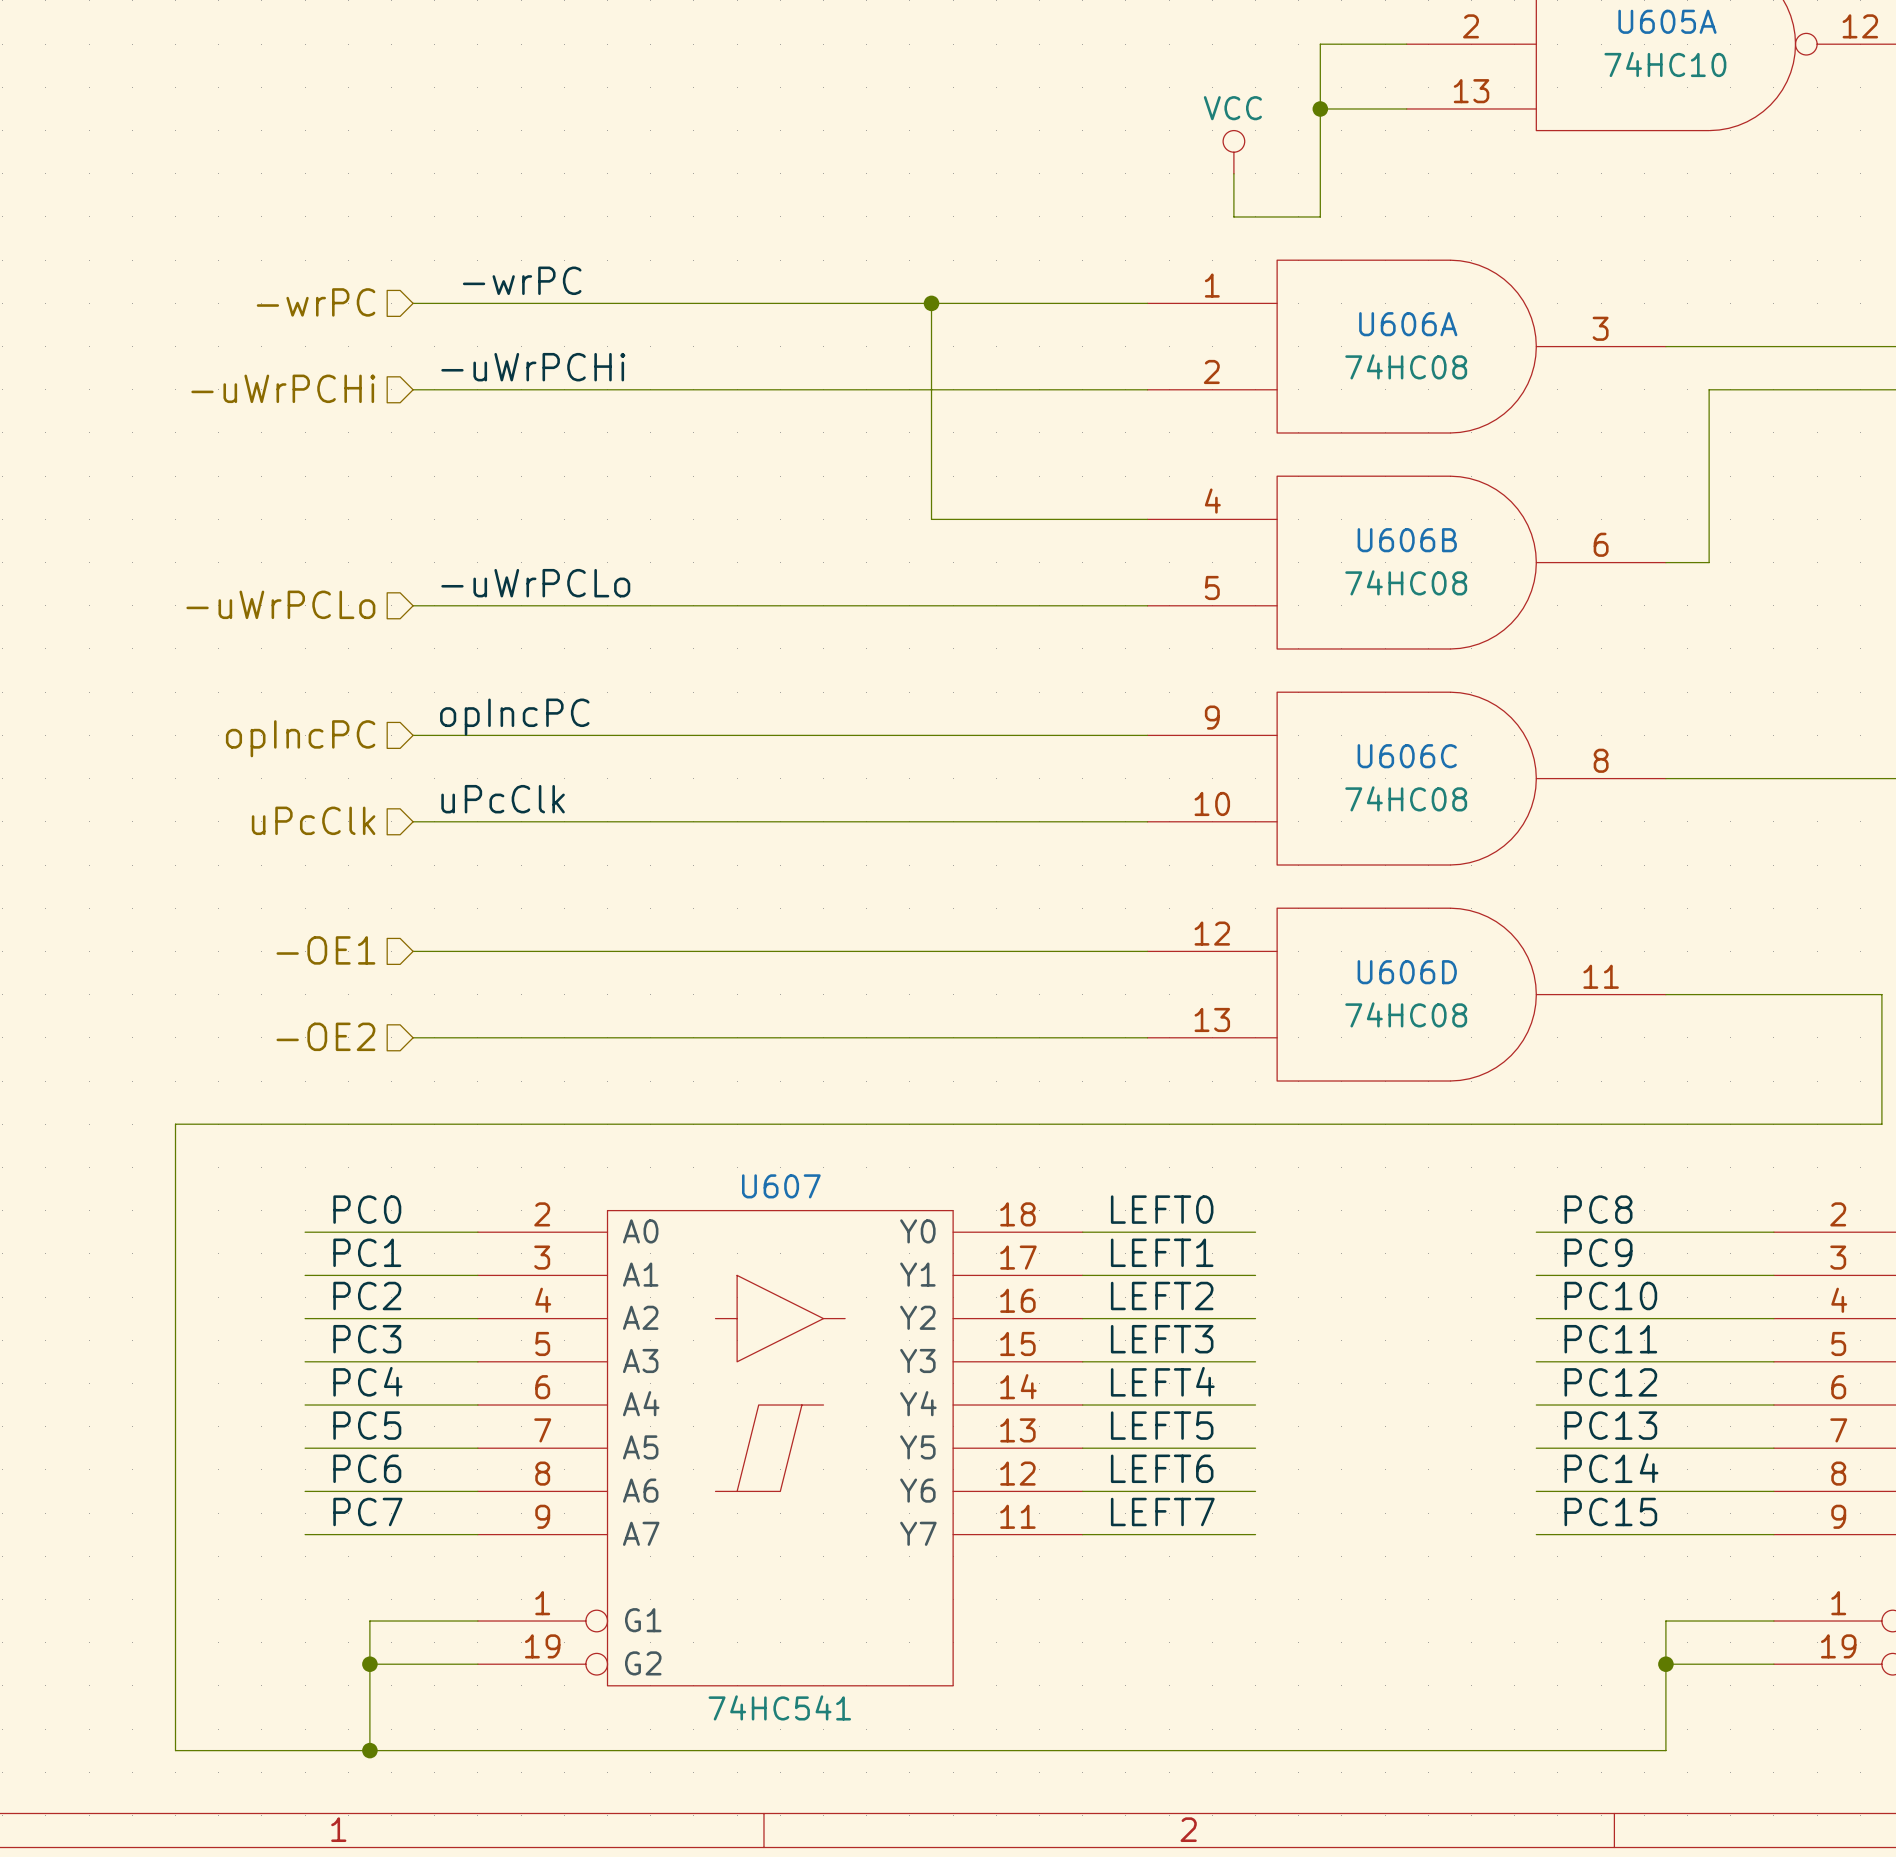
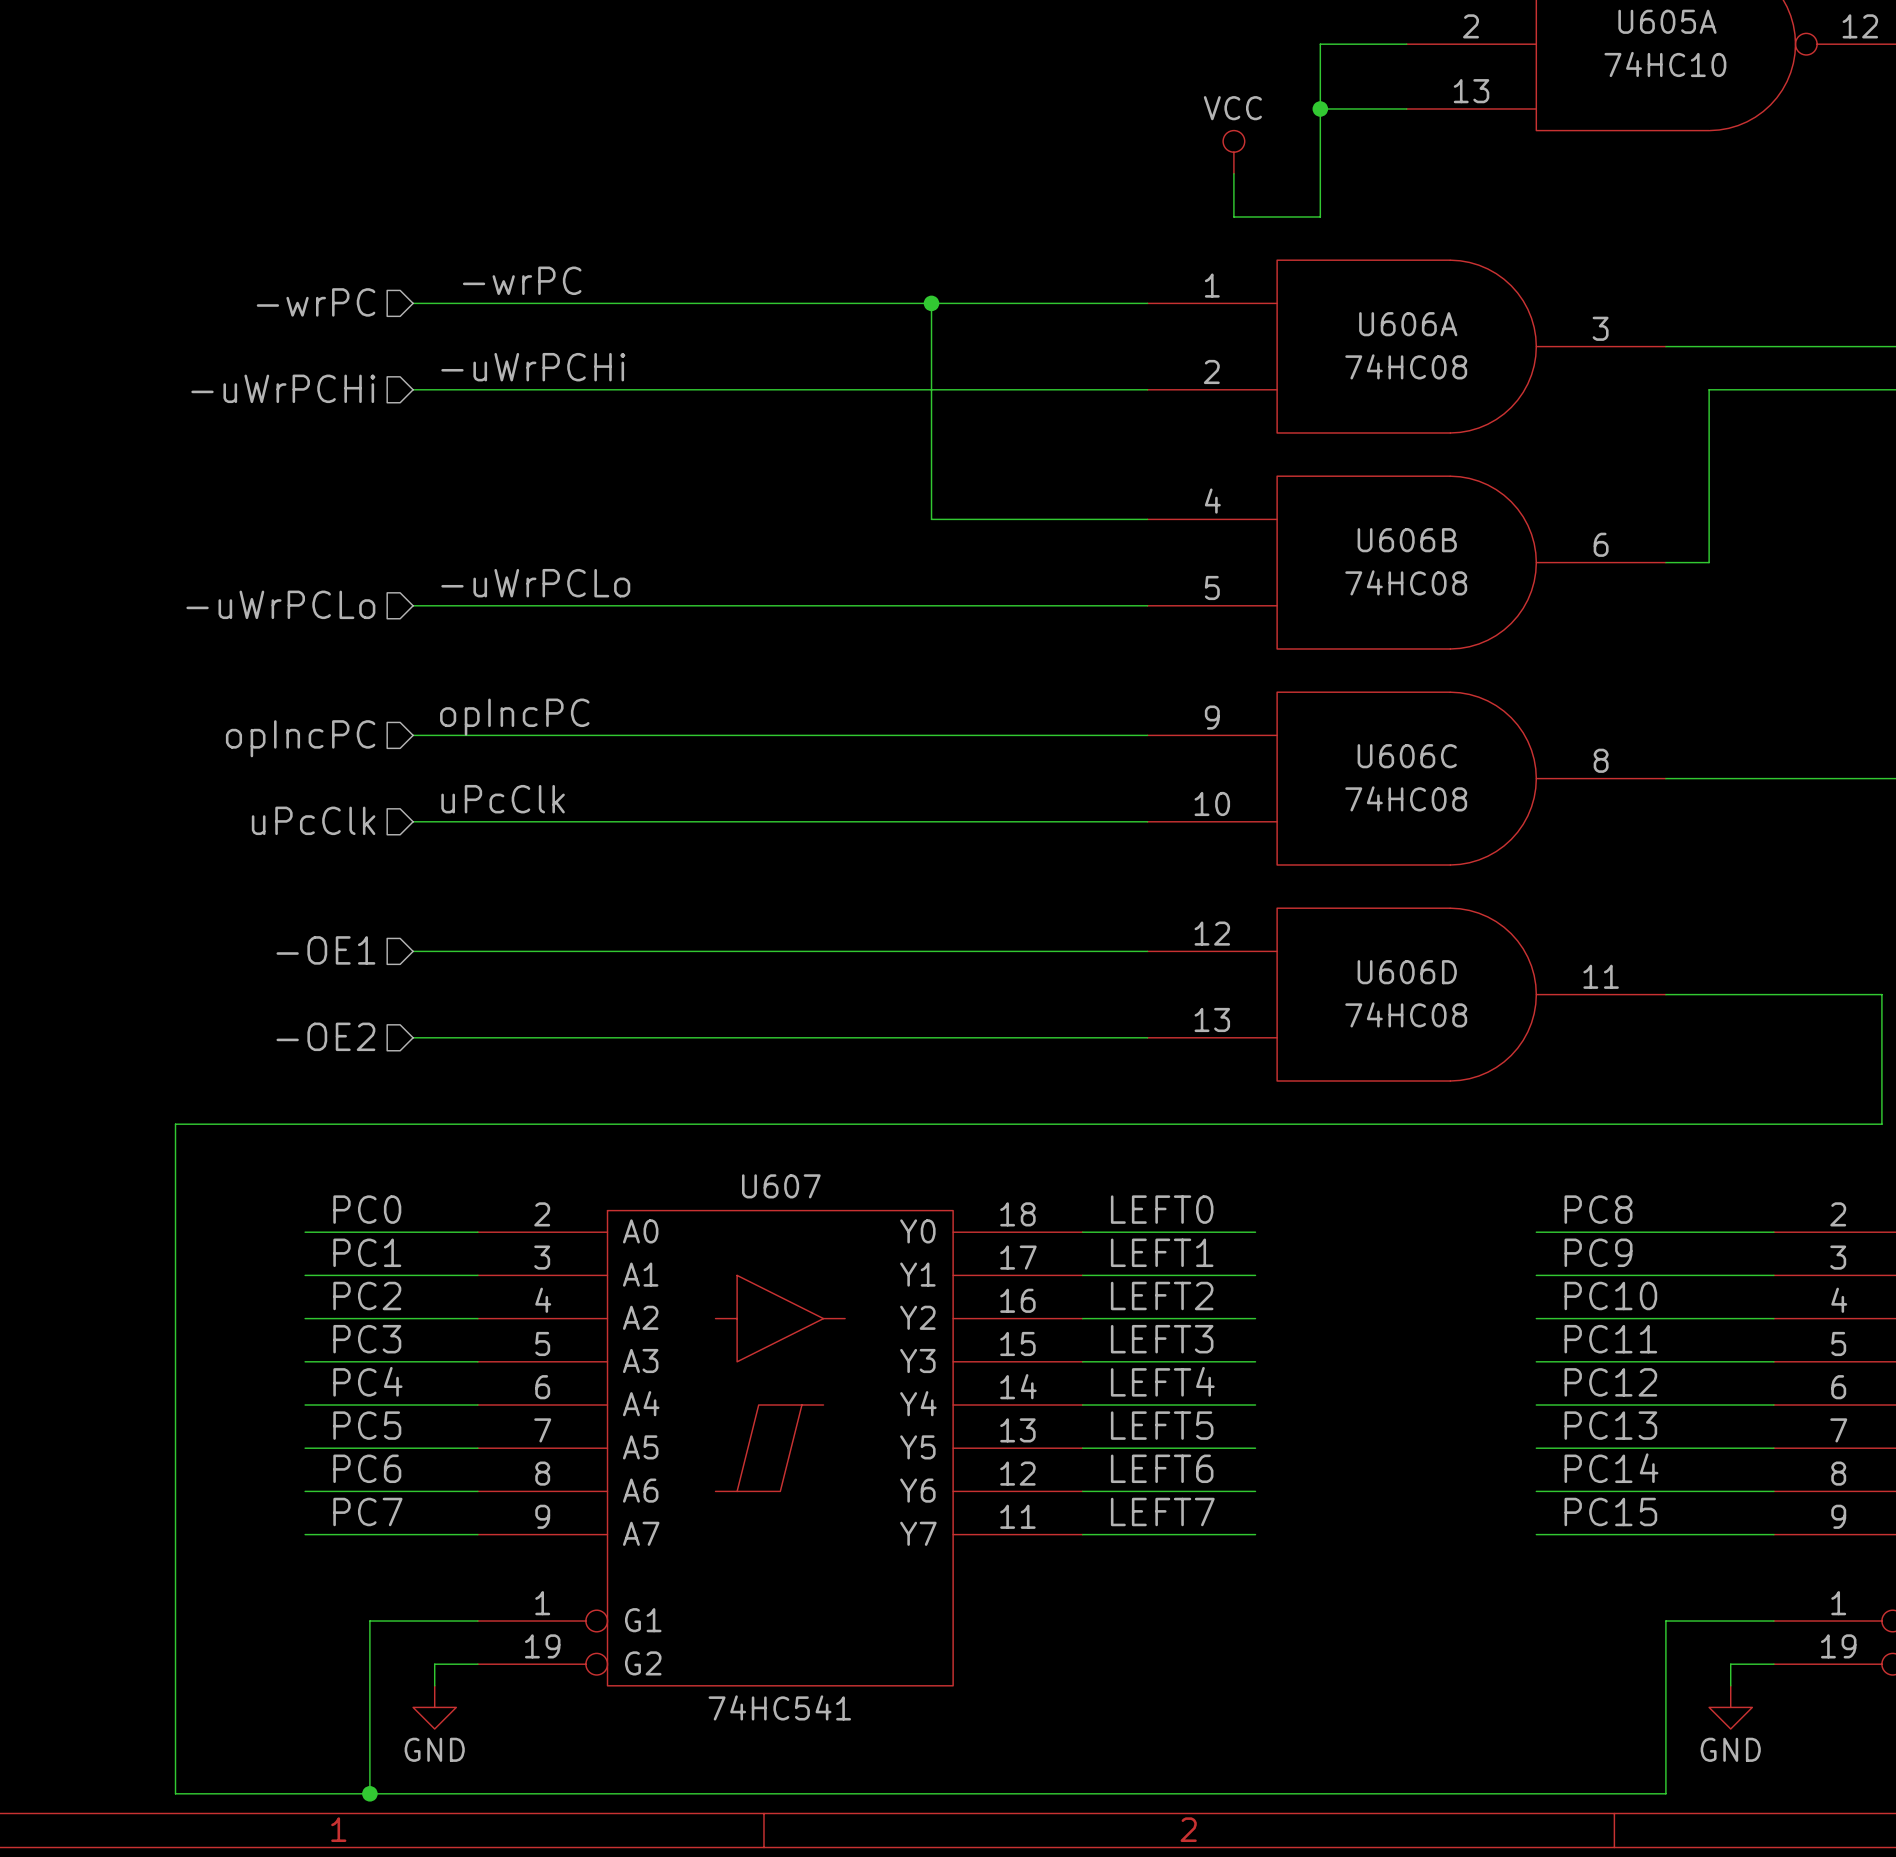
wire: (369, 1664) (434, 1664) -> (434, 1685) (434, 1664)
junction: (369, 1664) -> none
wire: (1665, 1664) (1730, 1664) -> (1730, 1685) (1730, 1664)
junction: (1665, 1664) -> none
power symbol: none -> GND (434, 1707)
power symbol: none -> GND (1730, 1707)
wire: (175, 1750) (1665, 1750) -> (175, 1750) (175, 1793) (1665, 1793) (1665, 1750)
wire: none -> (369, 1750) (369, 1793)
junction position: (369, 1750) -> (369, 1793)

